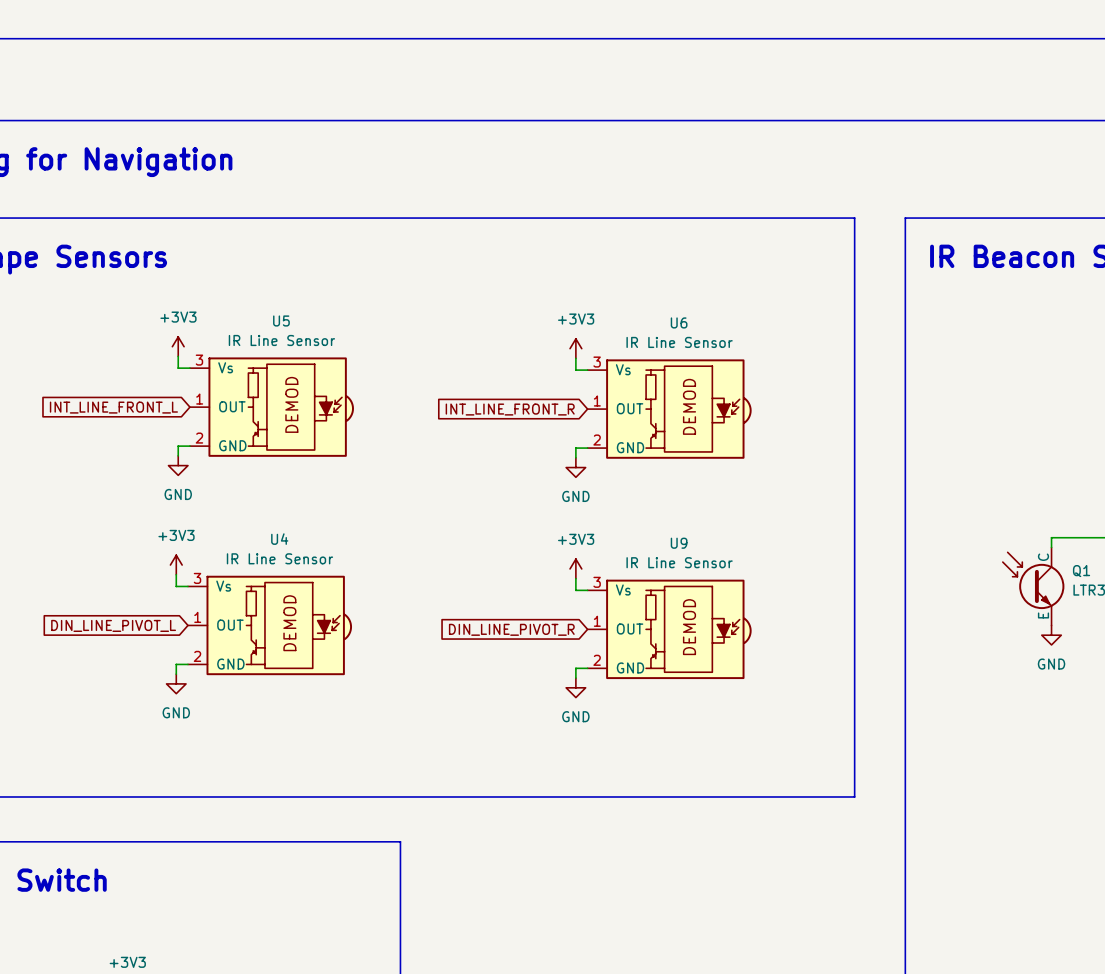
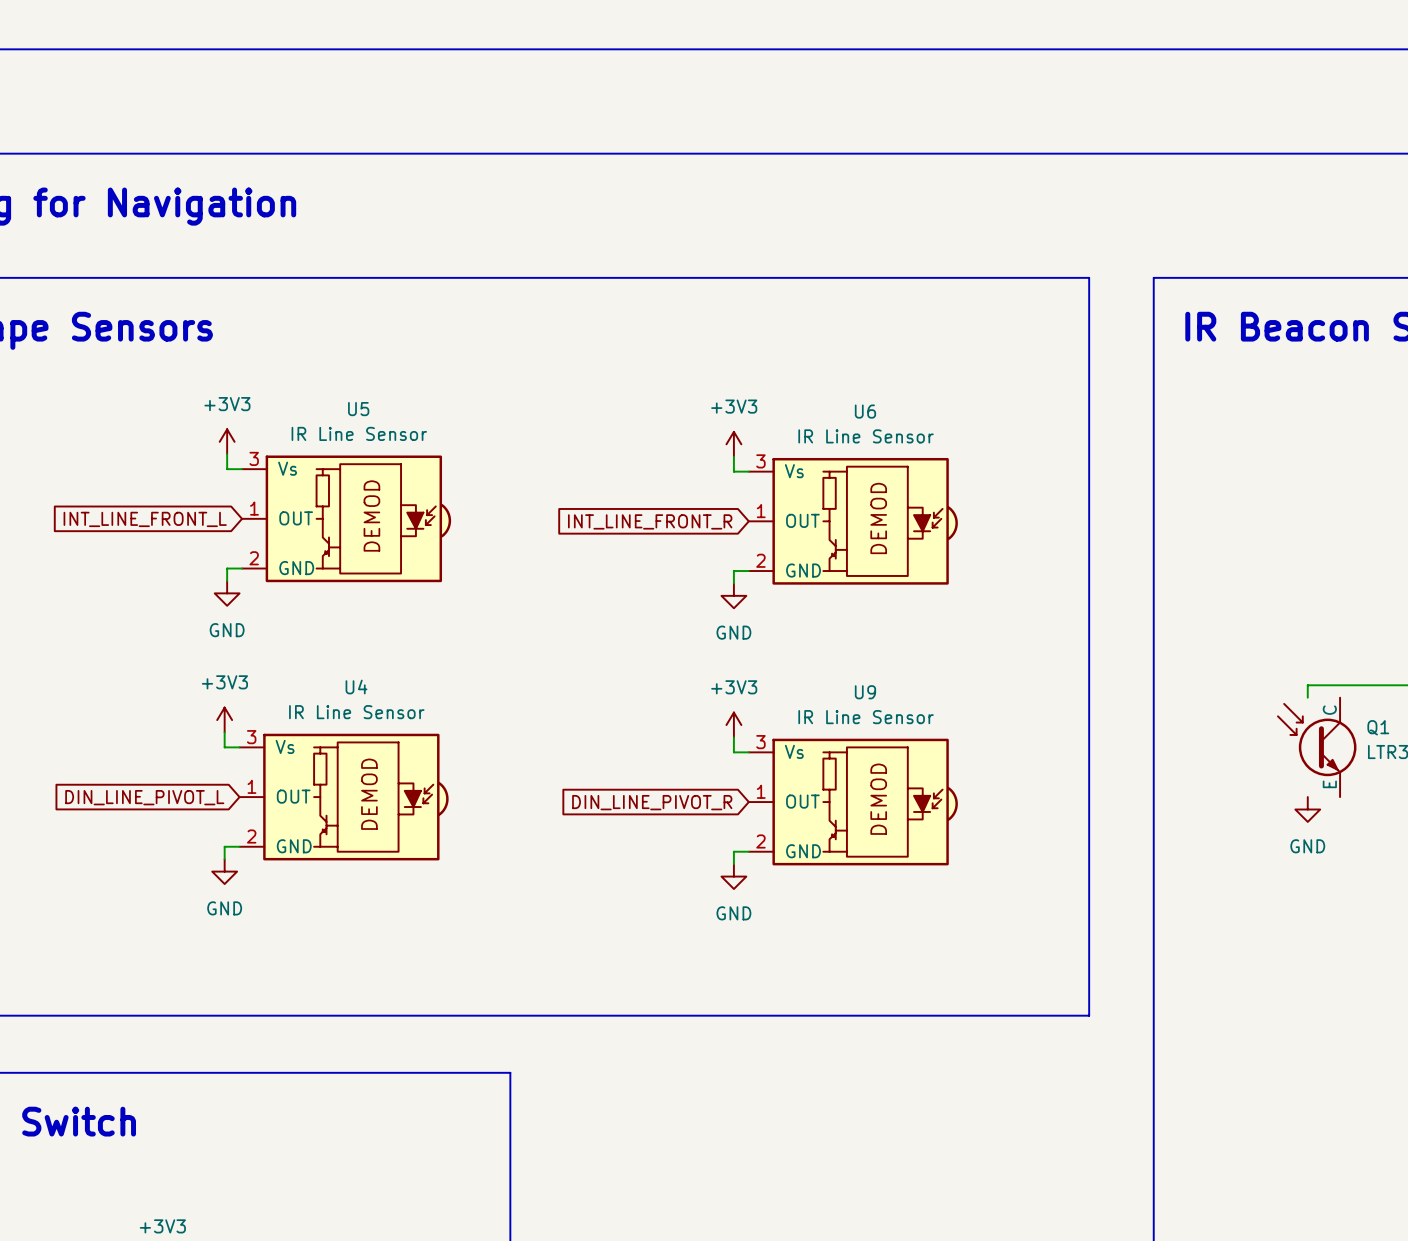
wire: (1051, 537) (1051, 547) -> (1340, 685) (1307, 685) (1307, 697)
power symbol position: GND (1051, 635) -> GND (1307, 809)

